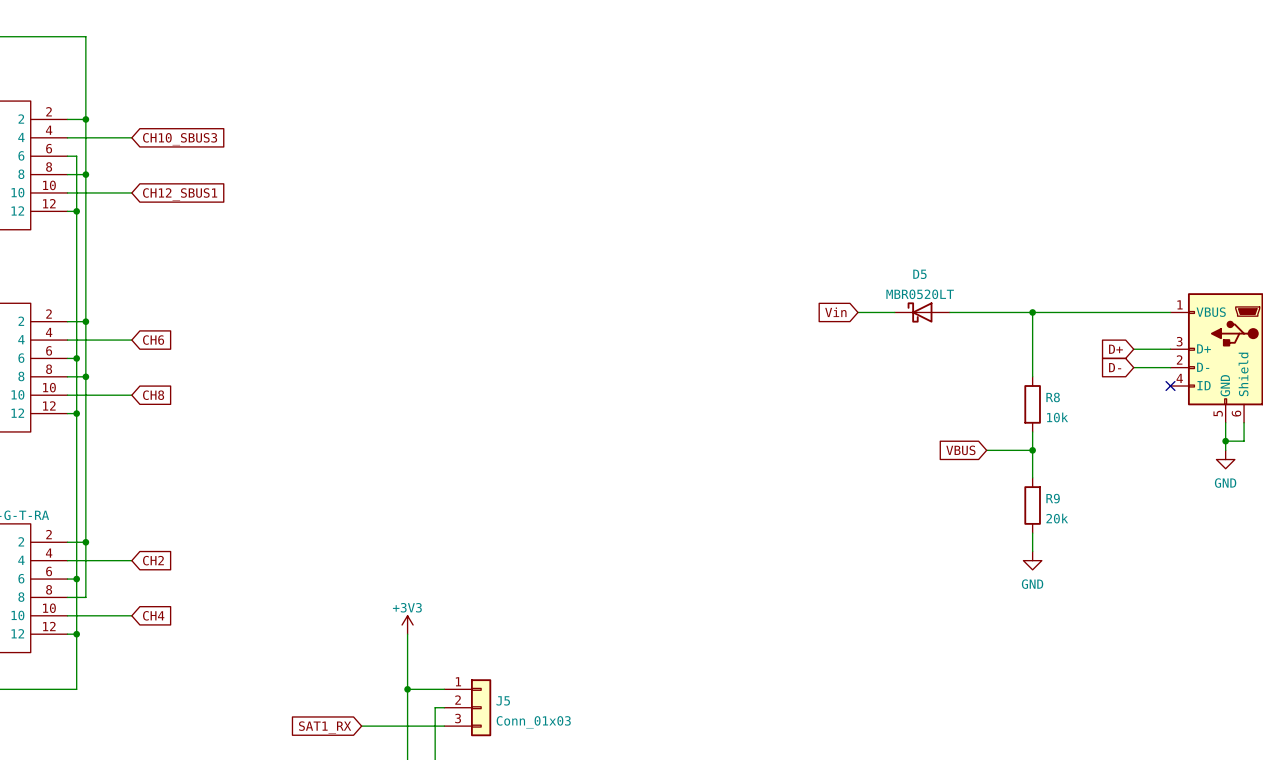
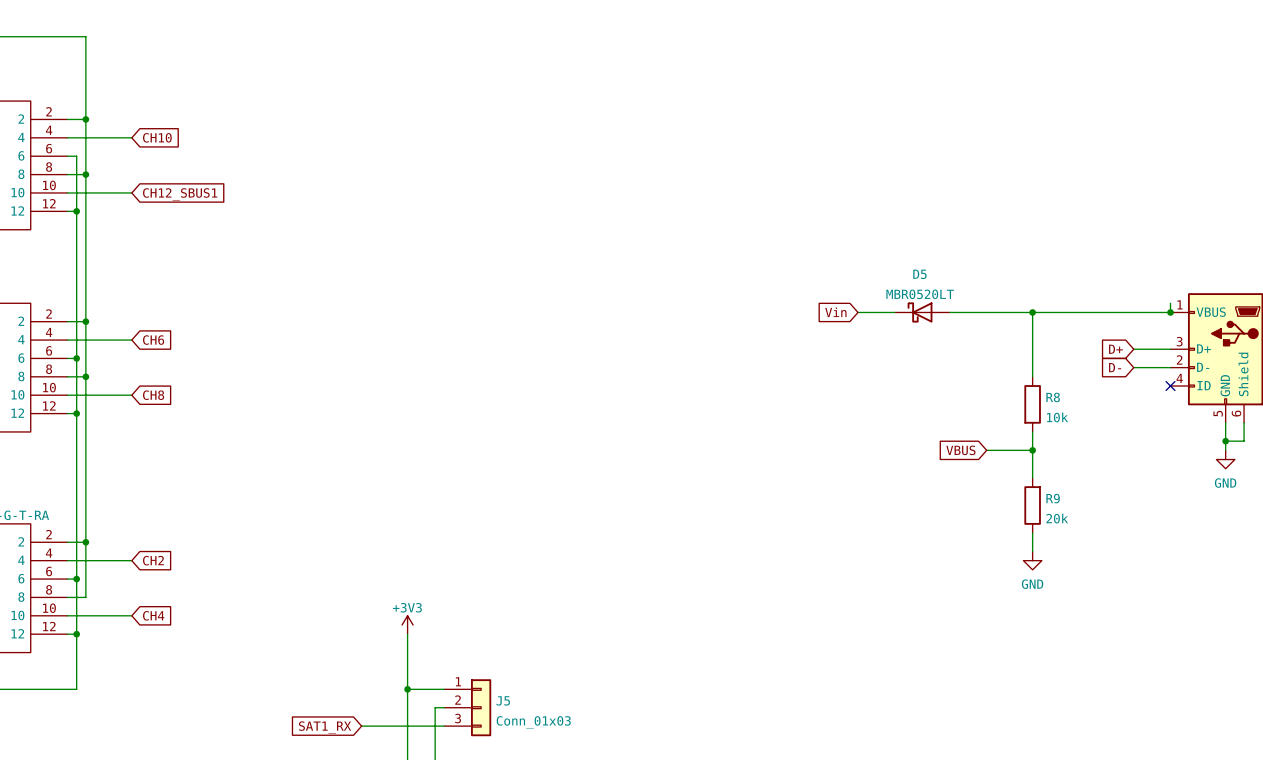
global label: CH10_SBUS3 (180, 139) -> CH10 (157, 137)
wire: none -> (1170, 303) (1170, 312)
junction: none -> (1170, 312)

